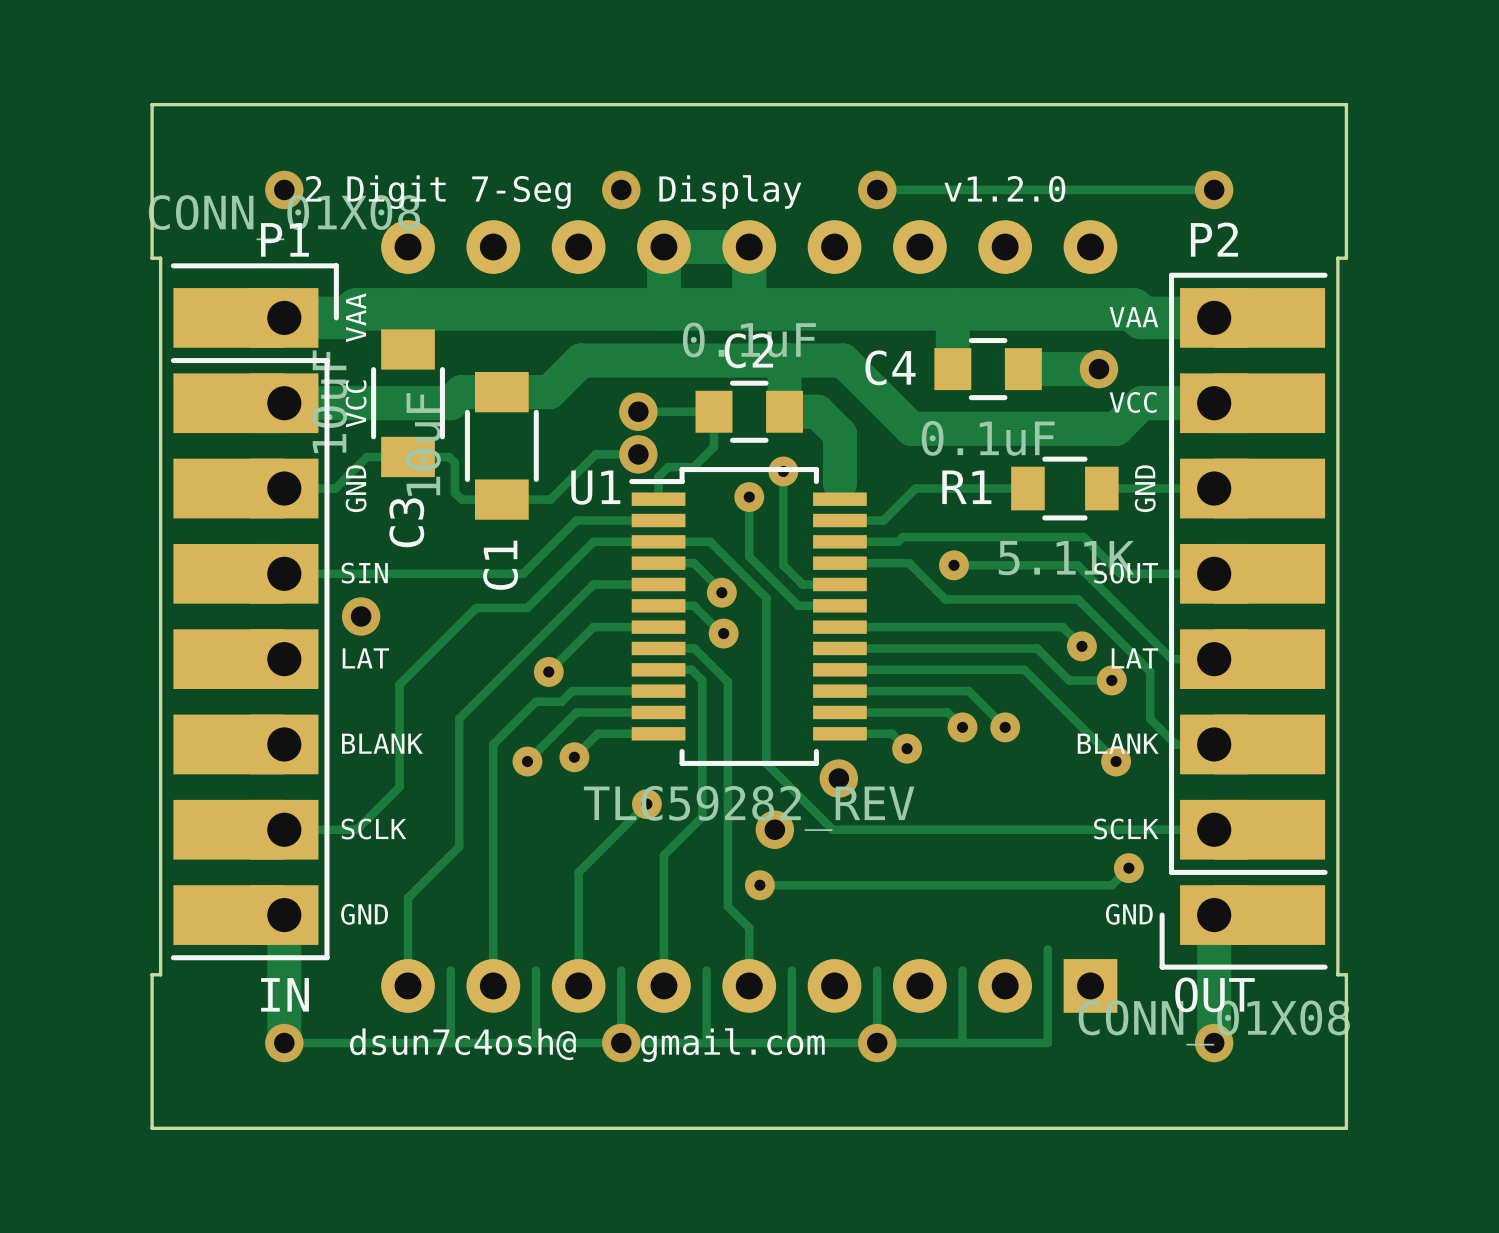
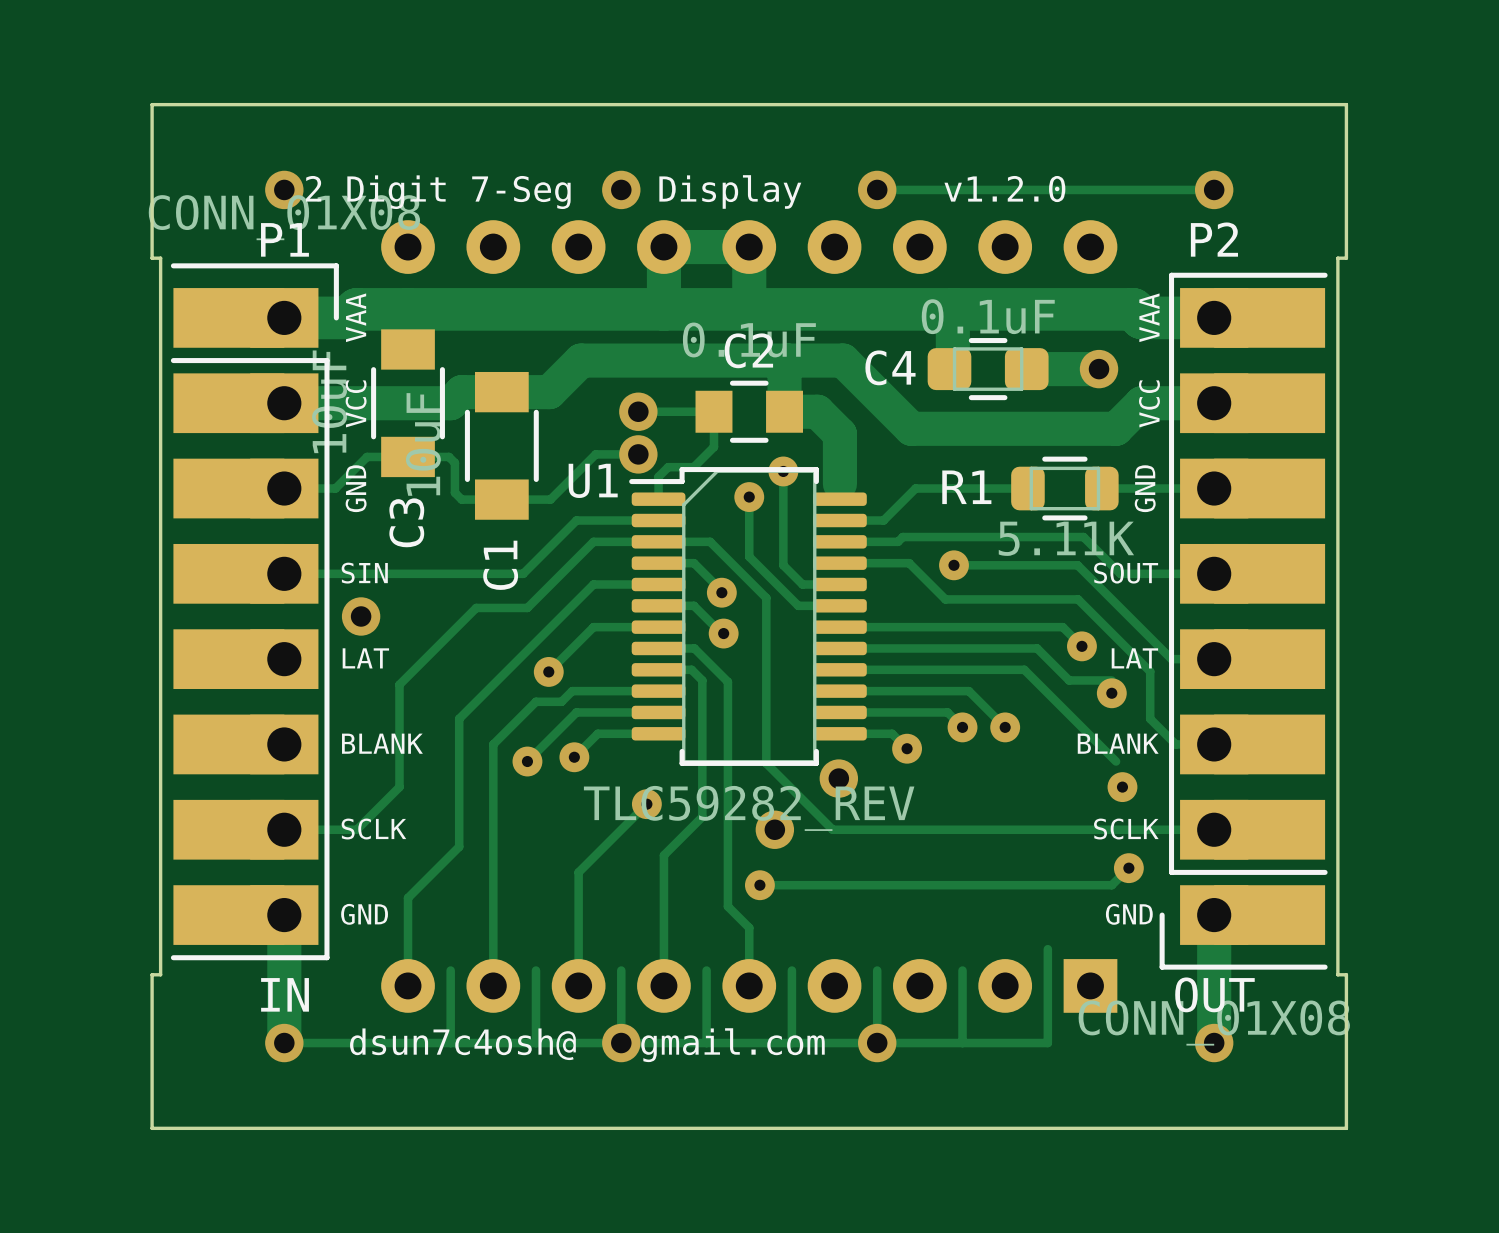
text rotation: 0° (1133, 317) -> 90° counterclockwise (1149, 317)
C4 footprint: [934, 338, 1042, 401] -> [927, 338, 1049, 401]
text rotation: 0° (1133, 402) -> 90° counterclockwise (1149, 403)
C4 value position: 0.1uF (988, 438) -> 0.1uF (988, 316)
R1 footprint: [1011, 456, 1119, 521] -> [1011, 456, 1119, 521]
U1 footprint: [629, 467, 867, 766] -> [629, 467, 867, 766]
via position: (1111, 680) -> (1111, 693)
via position: (1116, 761) -> (1122, 787)

